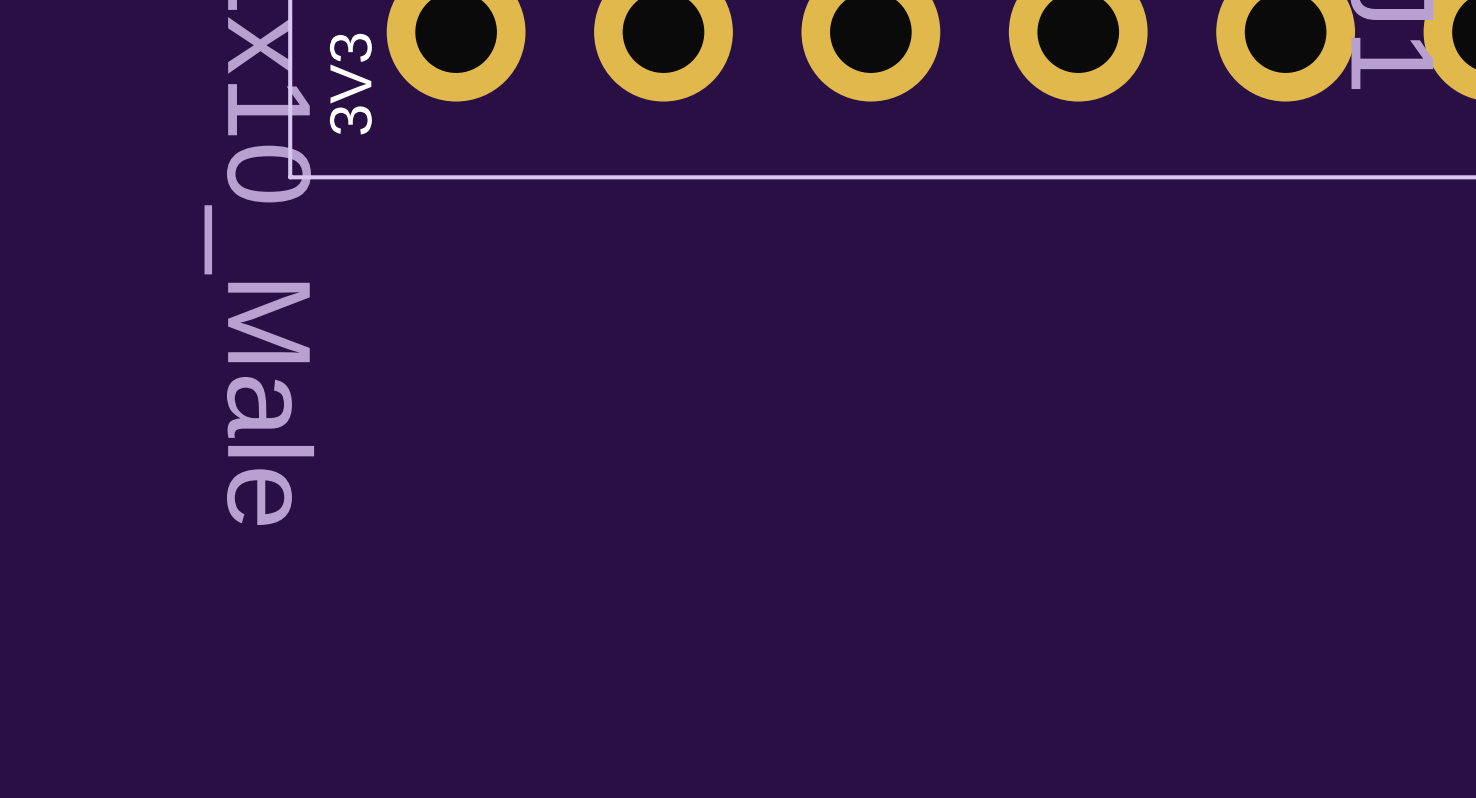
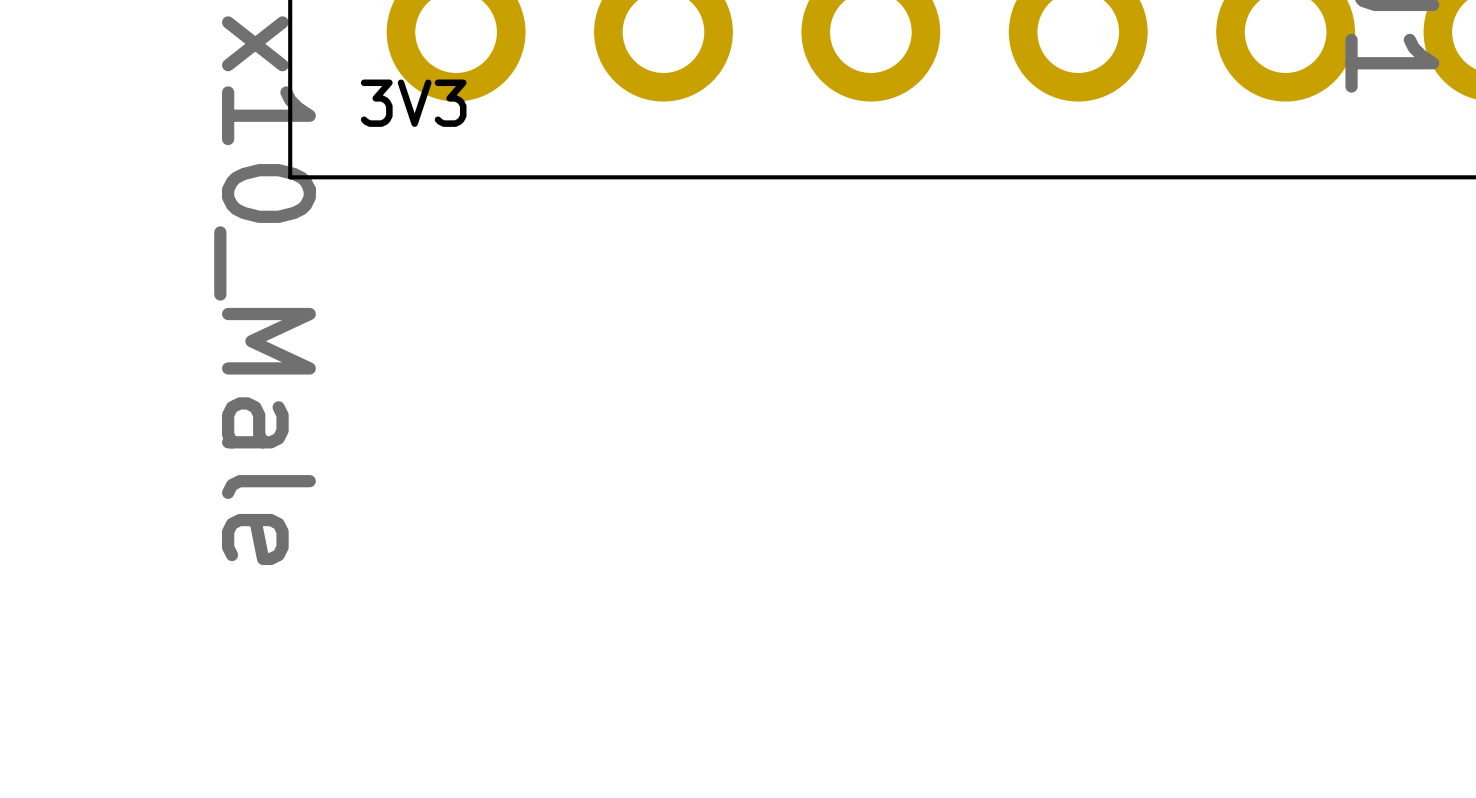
text rotation: 0° (350, 84) -> 90° clockwise (413, 103)

